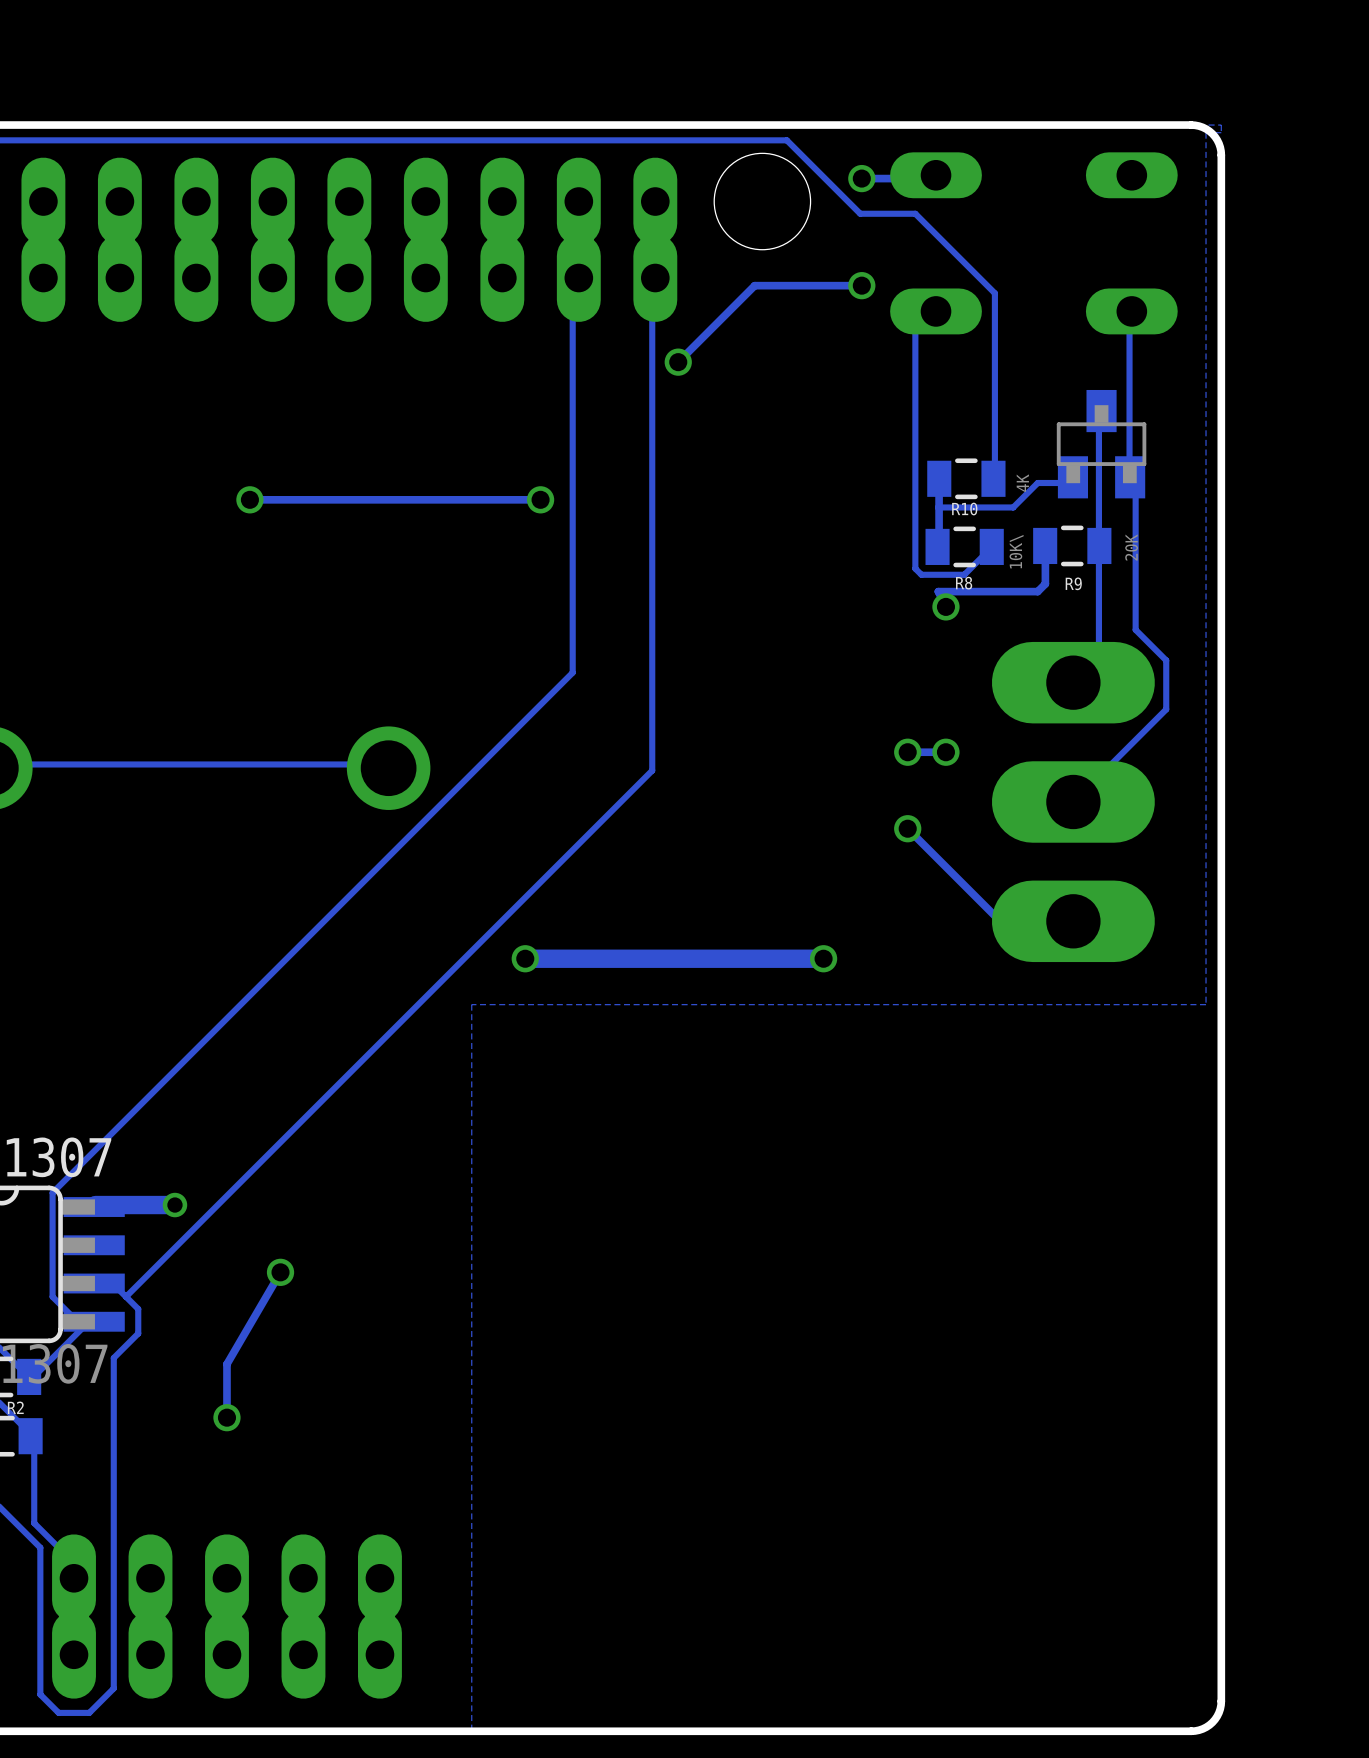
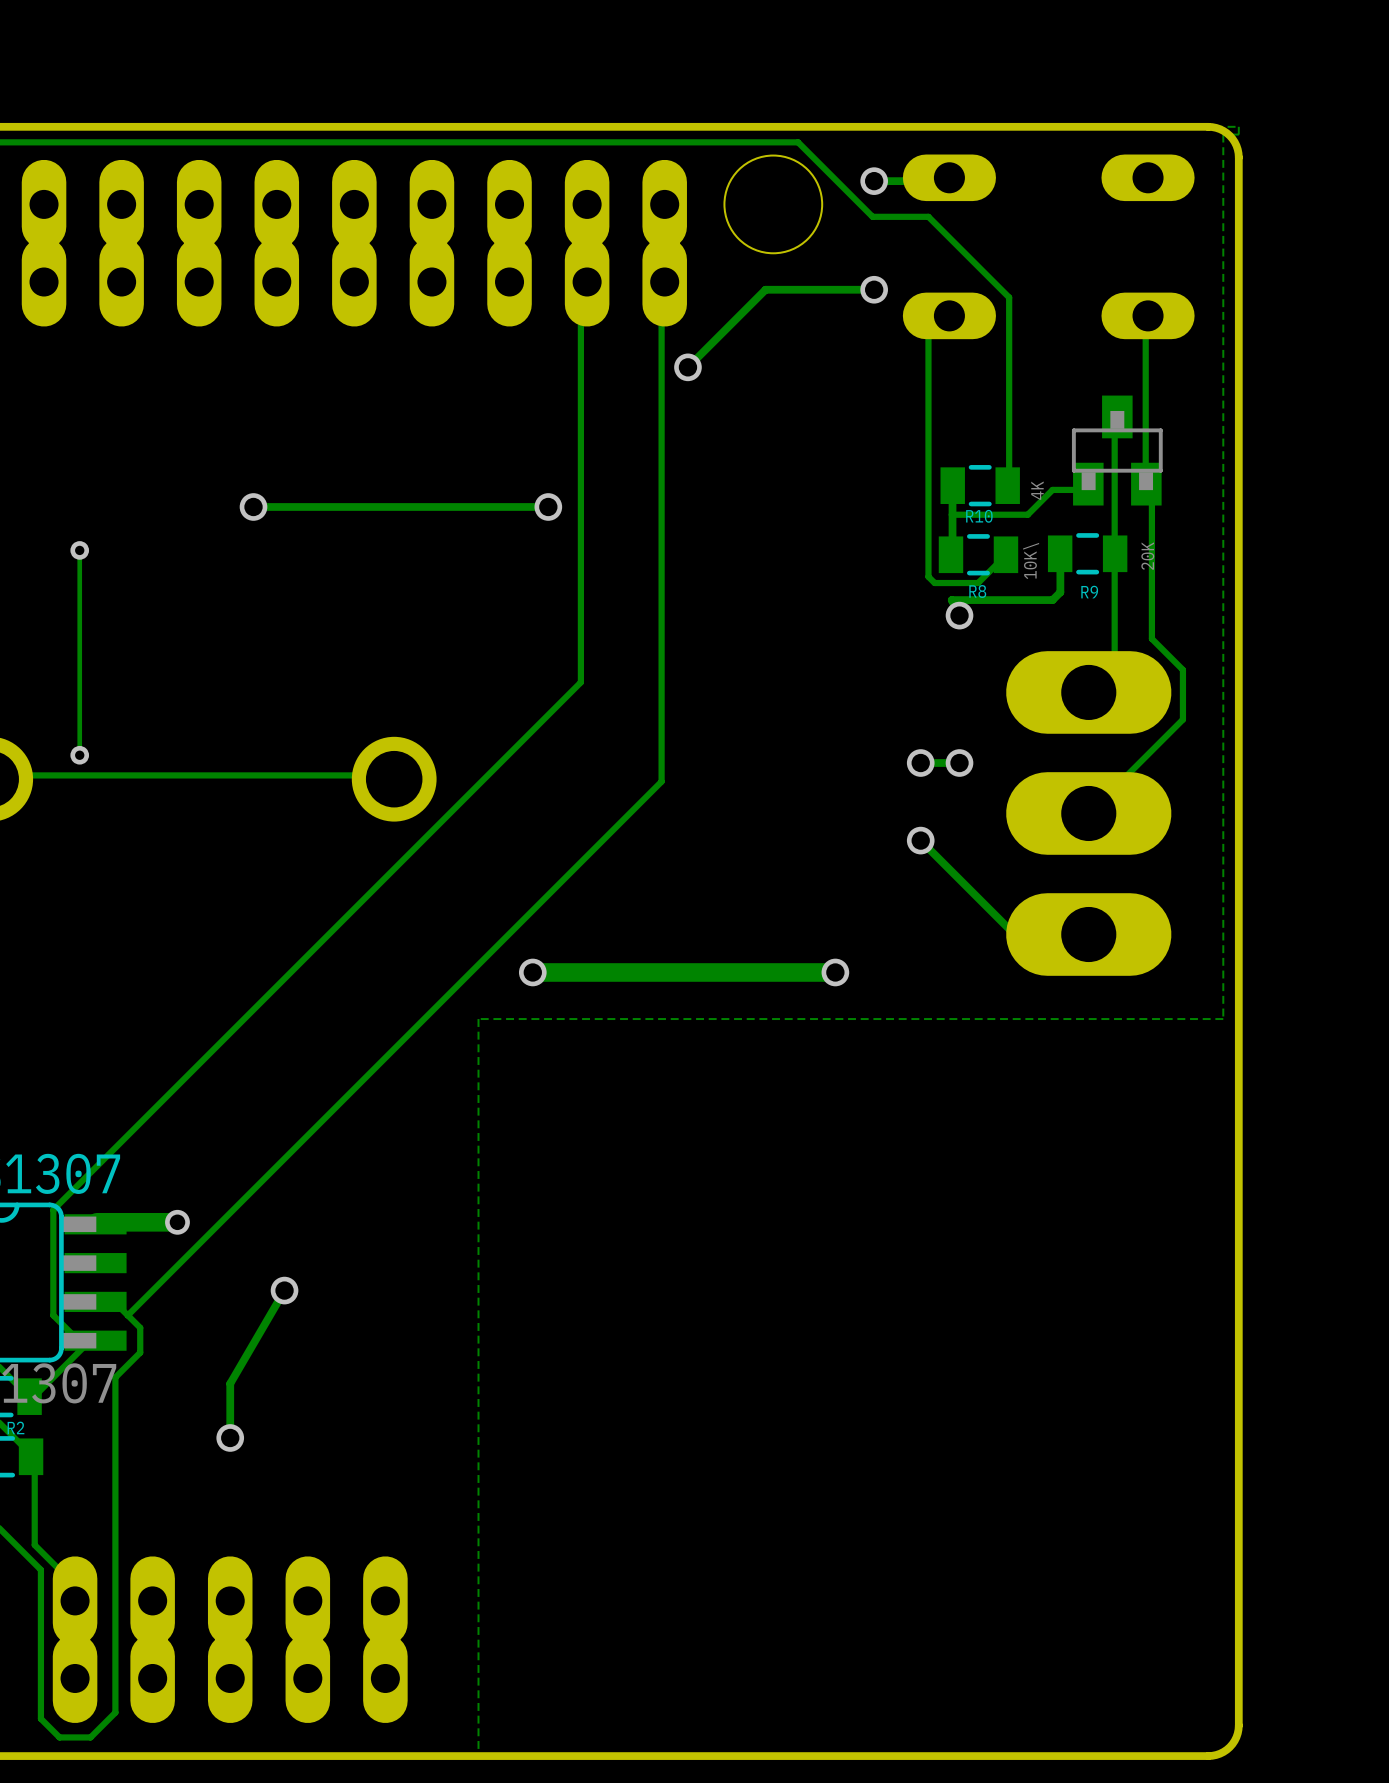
track: none -> (79, 550) (79, 755)
via: none -> (79, 550)
via: none -> (79, 755)

